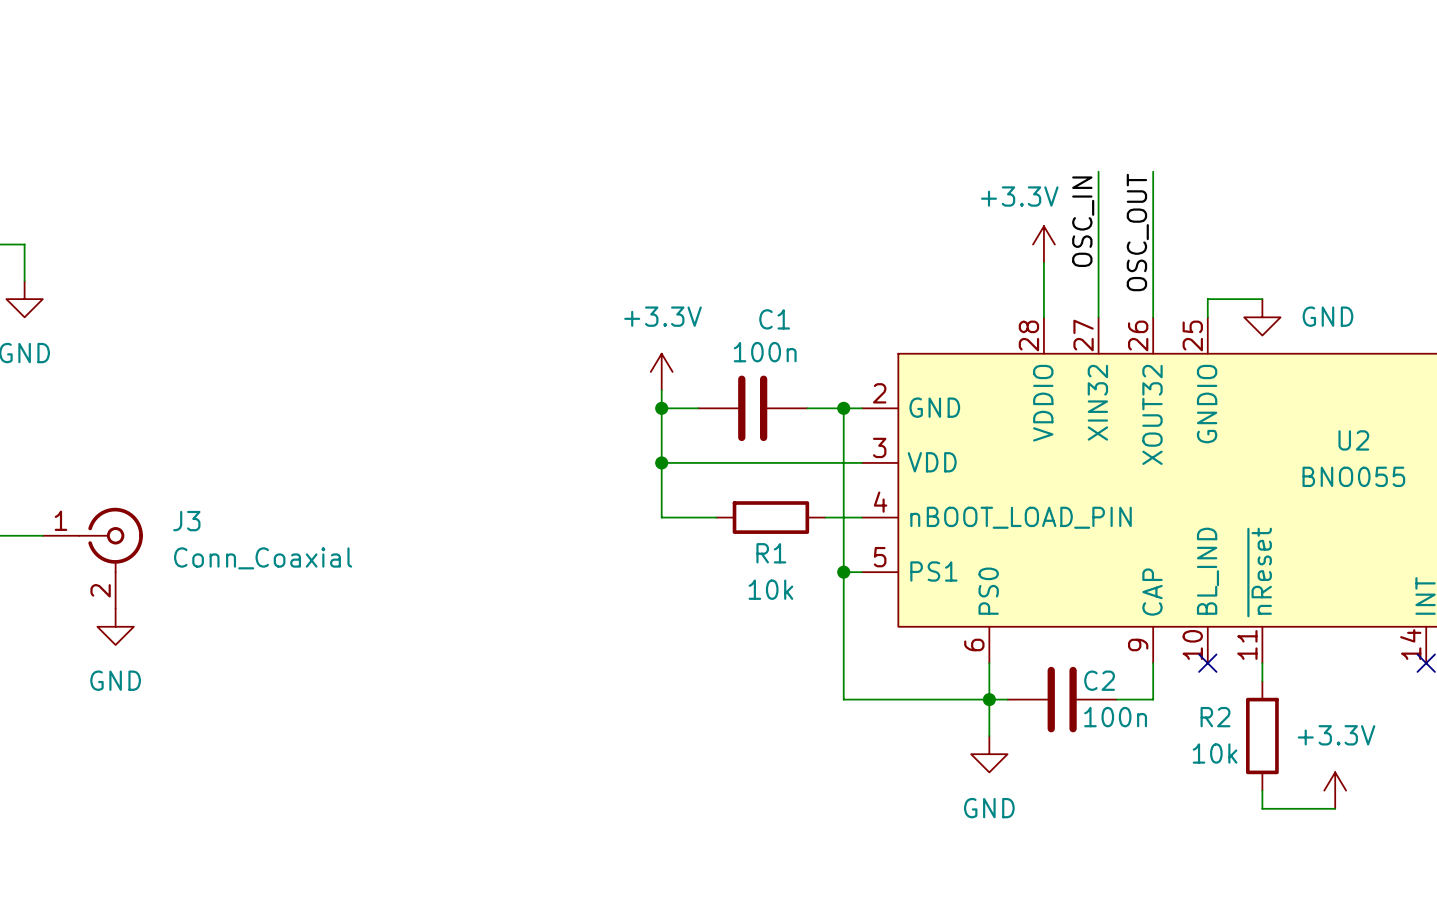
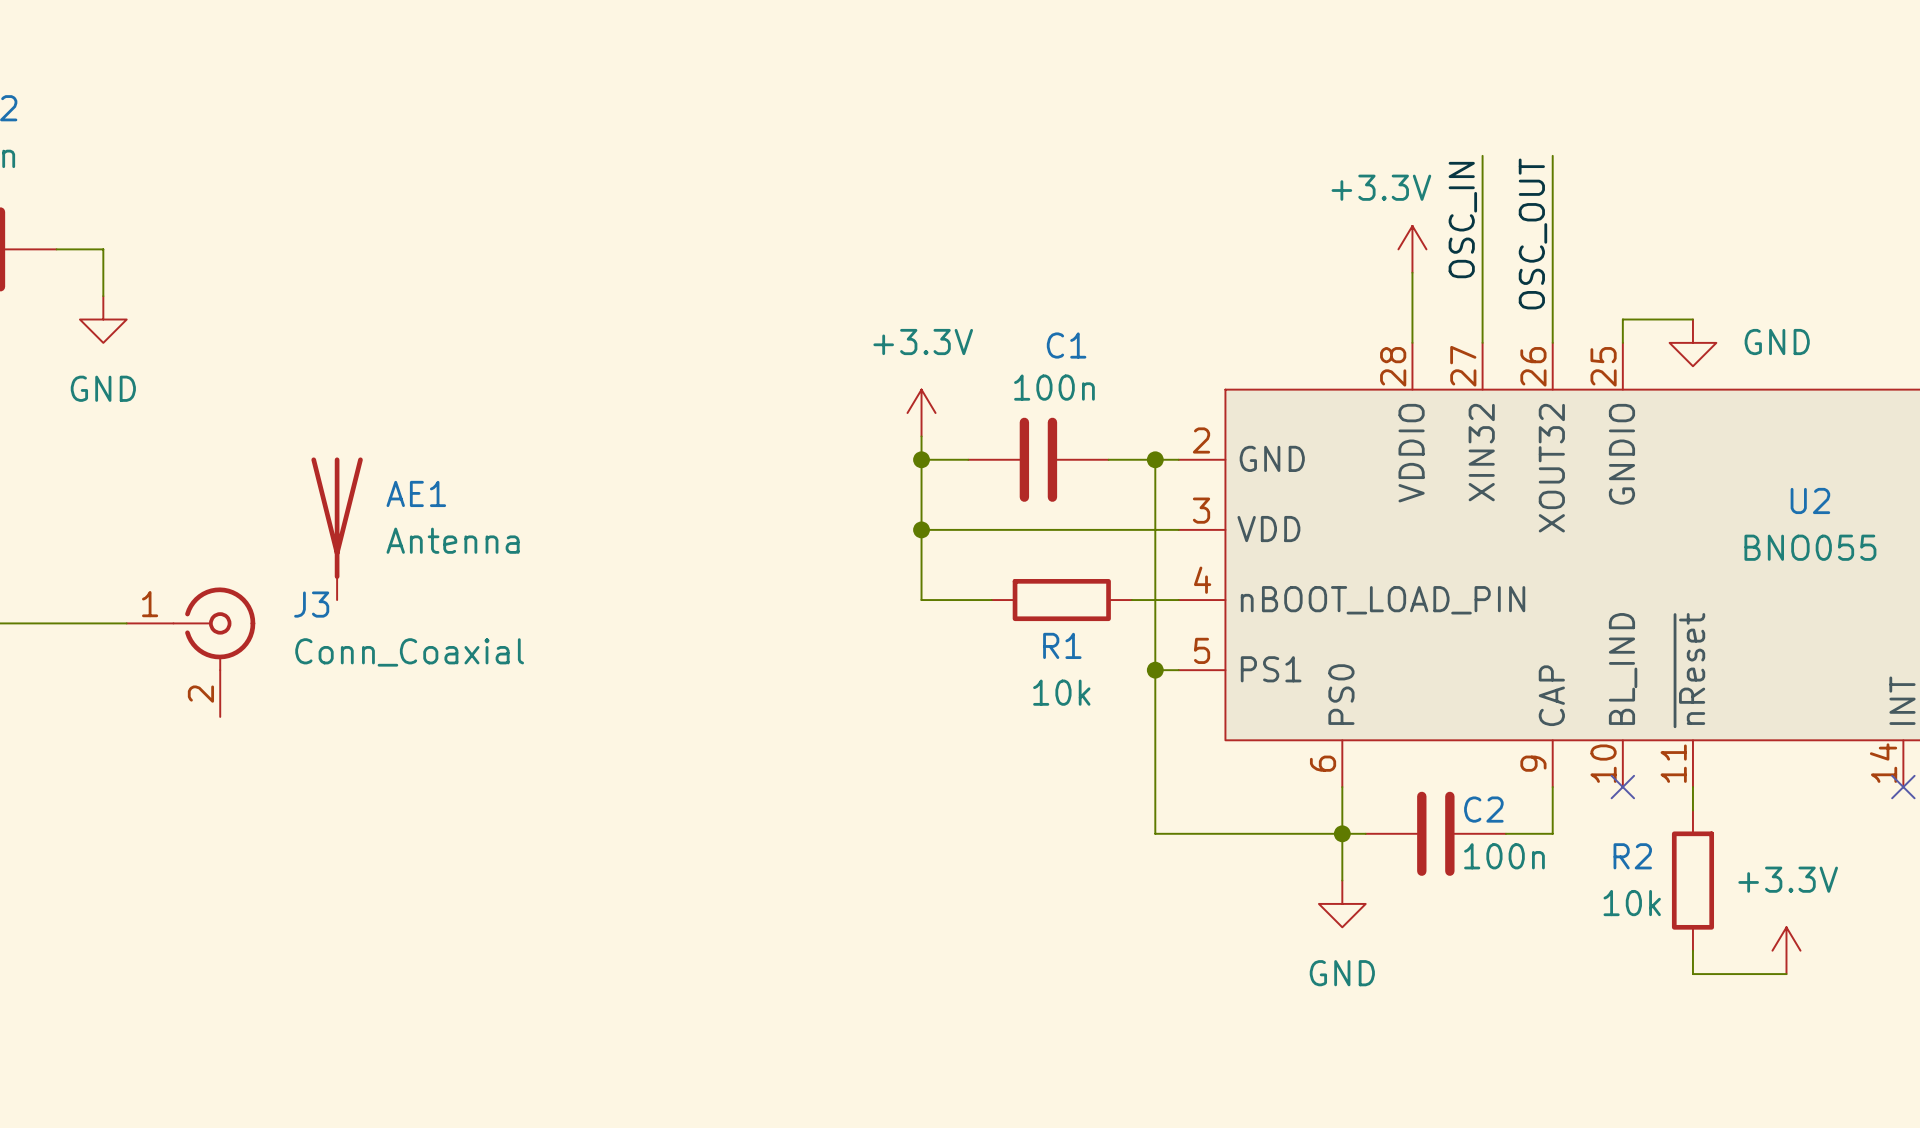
AE1: none -> Antenna (337, 528)
power symbol: GND (115, 626) -> none

